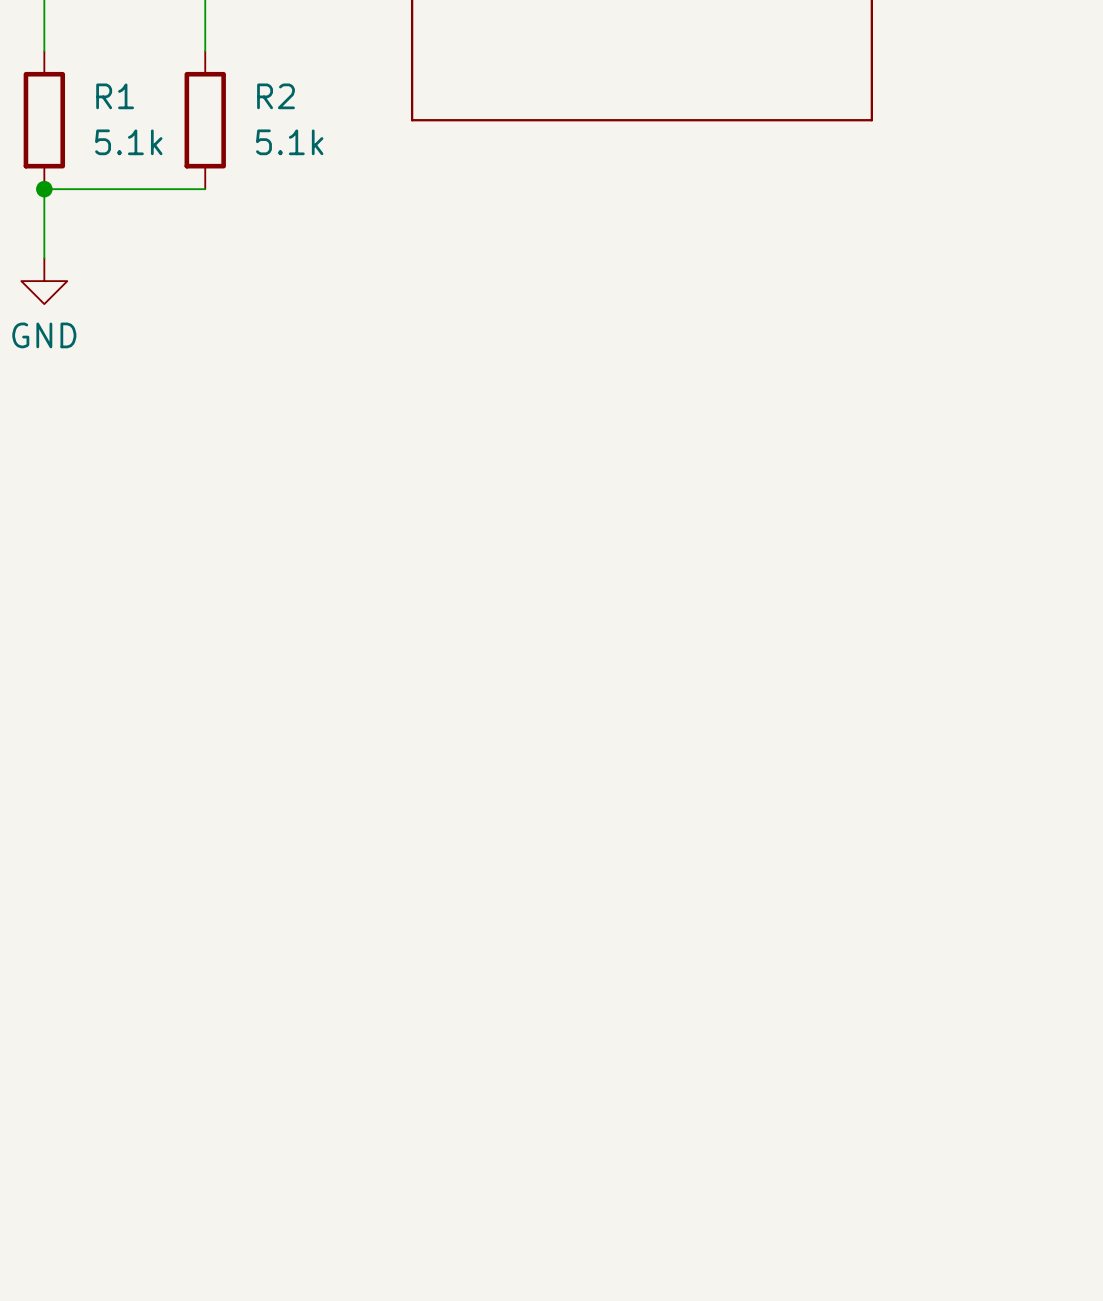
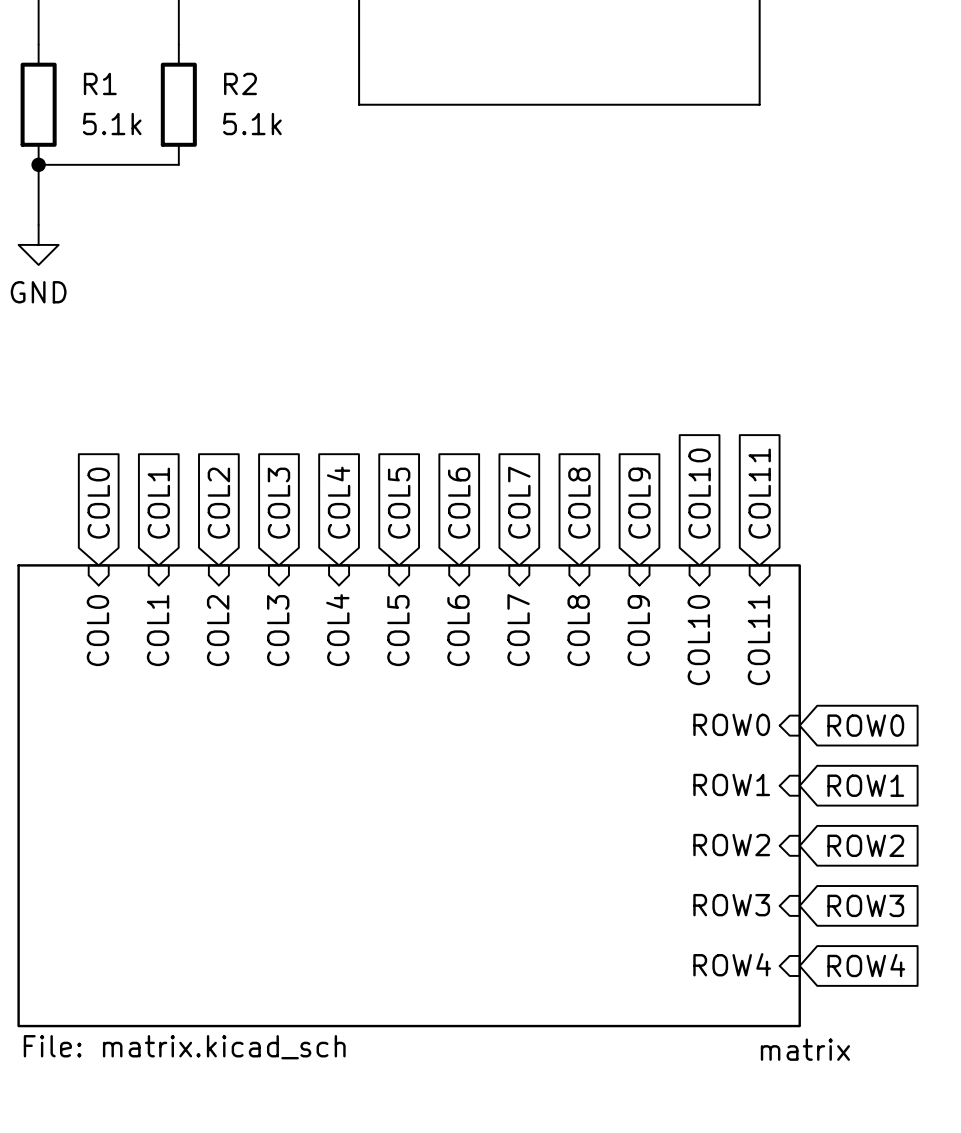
global label: none -> COL10 (699, 493)
global label: none -> COL11 (759, 493)
global label: none -> COL4 (338, 502)
global label: none -> COL7 (519, 502)
global label: none -> COL0 (98, 503)
global label: none -> COL1 (158, 503)
global label: none -> COL2 (218, 503)
global label: none -> COL3 (278, 503)
global label: none -> COL5 (399, 503)
global label: none -> COL6 (459, 503)
global label: none -> COL8 (579, 503)
global label: none -> COL9 (639, 503)
sheet pin: none -> COL0 (97, 630)
sheet pin: none -> COL1 (158, 630)
sheet pin: none -> COL2 (218, 630)
sheet pin: none -> COL3 (278, 630)
sheet pin: none -> COL4 (337, 630)
sheet pin: none -> COL5 (398, 630)
sheet pin: none -> COL6 (458, 630)
sheet pin: none -> COL7 (518, 630)
sheet pin: none -> COL8 (578, 630)
sheet pin: none -> COL9 (638, 630)
sheet pin: none -> COL10 (698, 640)
sheet pin: none -> COL11 (758, 640)
sheet pin: none -> ROW0 (731, 724)
global label: none -> ROW0 (865, 725)
sheet pin: none -> ROW1 (731, 784)
global label: none -> ROW1 (865, 785)
sheet matrix: none -> File: matrix.kicad_sch (409, 795)
sheet pin: none -> ROW2 (731, 845)
global label: none -> ROW2 (865, 845)
sheet pin: none -> ROW3 (731, 905)
global label: none -> ROW3 (865, 905)
sheet pin: none -> ROW4 (732, 964)
global label: none -> ROW4 (866, 965)

